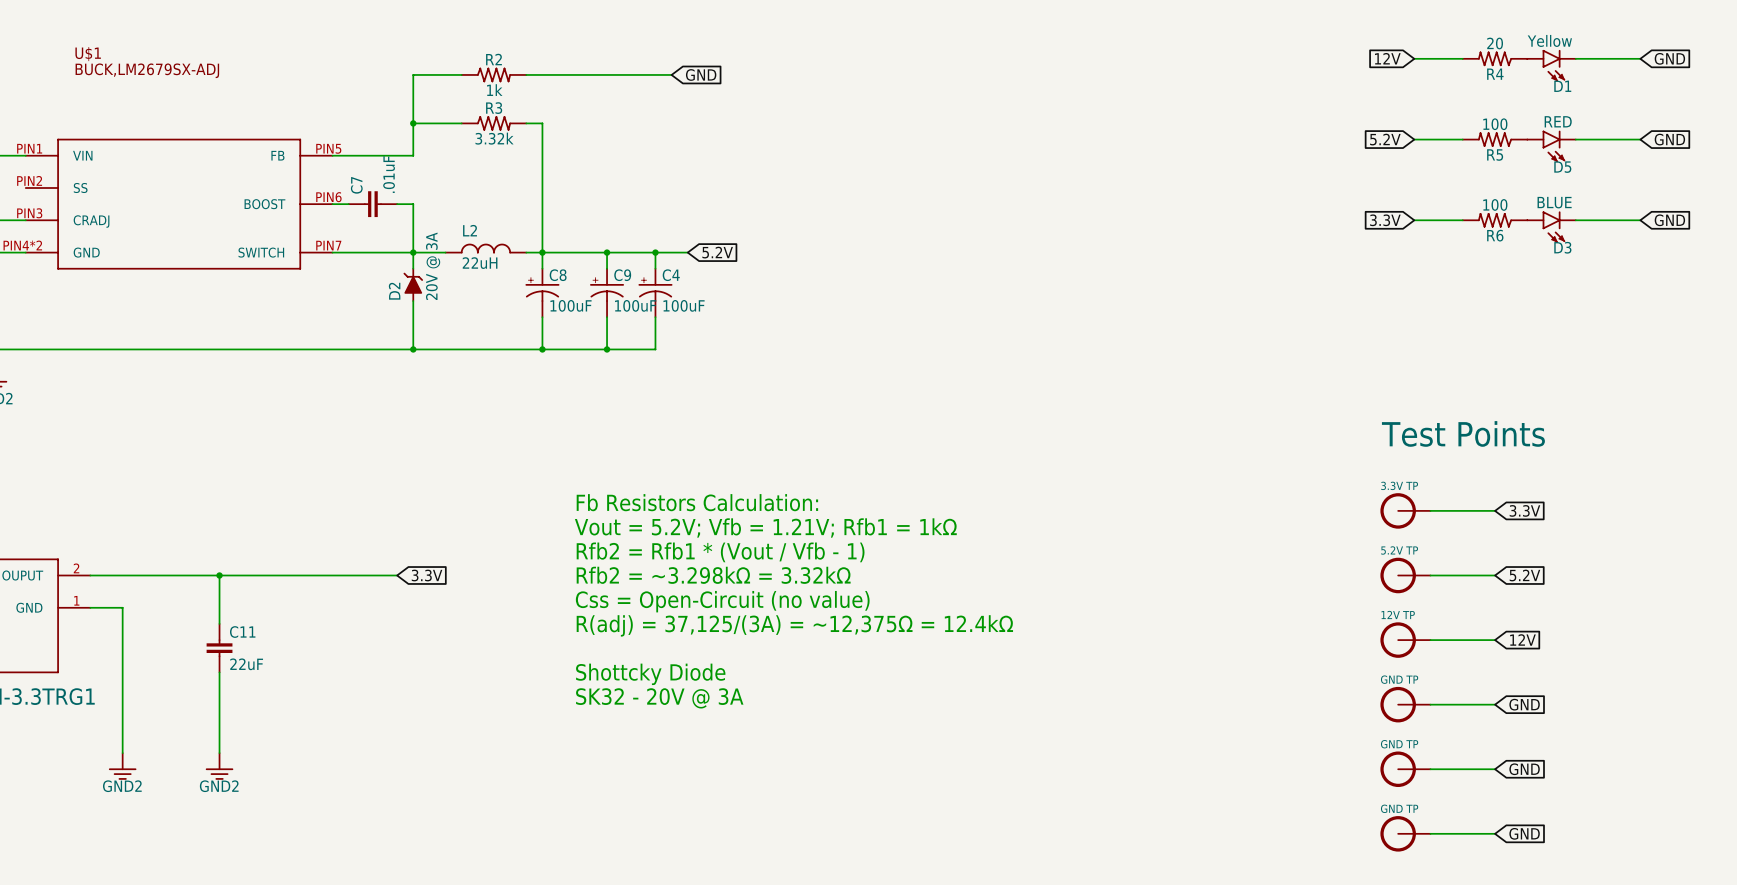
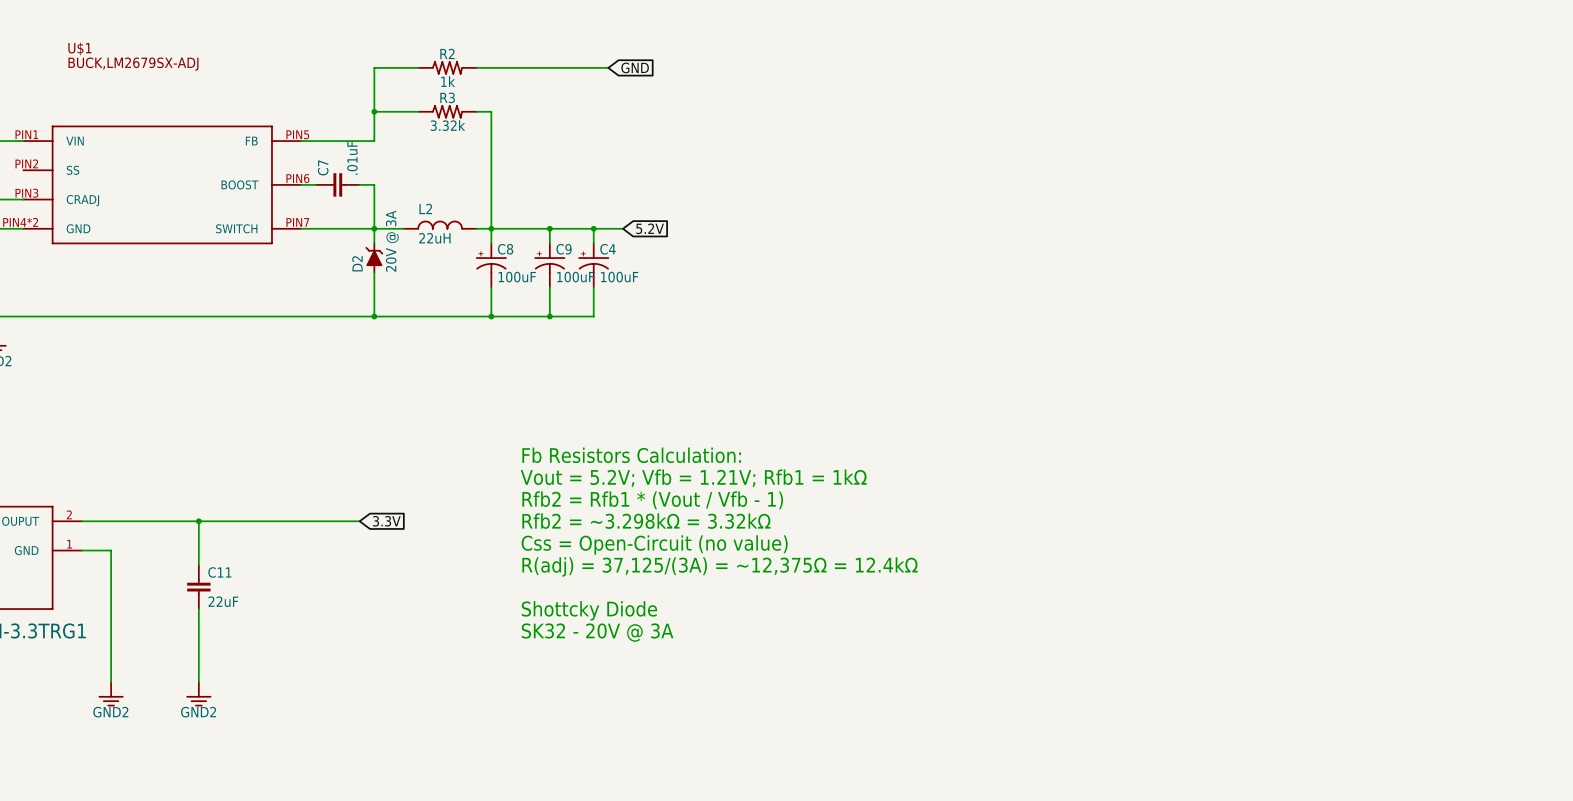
global label: 12V (1387, 58) -> none
wire: (1414, 58) (1462, 58) -> none
R4: 20 (1495, 58) -> none
wire: (1575, 58) (1640, 58) -> none
global label: GND (1669, 58) -> none
D1: Yellow (1551, 65) -> none
global label: 5.2V (1385, 139) -> none
wire: (1414, 139) (1462, 139) -> none
R5: 100 (1495, 139) -> none
wire: (1575, 139) (1640, 139) -> none
global label: GND (1669, 139) -> none
D5: RED (1551, 146) -> none
global label: 3.3V (1385, 220) -> none
wire: (1414, 220) (1462, 220) -> none
R6: 100 (1495, 220) -> none
wire: (1575, 220) (1640, 220) -> none
global label: GND (1669, 220) -> none
D3: BLUE (1551, 226) -> none
text: Test Points (1463, 433) -> none
part: (1405, 510) -> none
wire: (1430, 510) (1495, 510) -> none
global label: 3.3V (1524, 510) -> none
part: (1405, 575) -> none
wire: (1430, 575) (1495, 575) -> none
global label: 5.2V (1524, 575) -> none
global label: 12V (1522, 639) -> none
part: (1405, 640) -> none
wire: (1430, 640) (1495, 640) -> none
part: (1405, 704) -> none
wire: (1430, 704) (1495, 704) -> none
global label: GND (1524, 704) -> none
part: (1405, 769) -> none
wire: (1430, 769) (1495, 769) -> none
global label: GND (1524, 769) -> none
part: (1405, 833) -> none
wire: (1430, 833) (1495, 833) -> none
global label: GND (1524, 833) -> none

